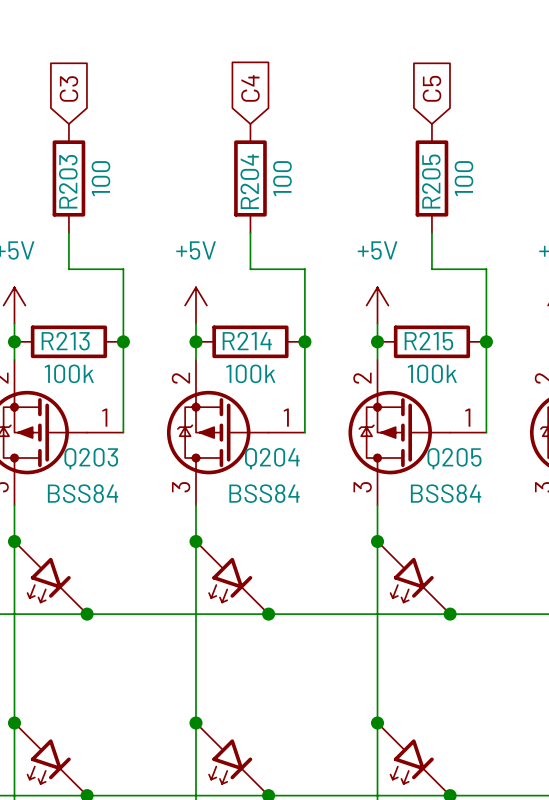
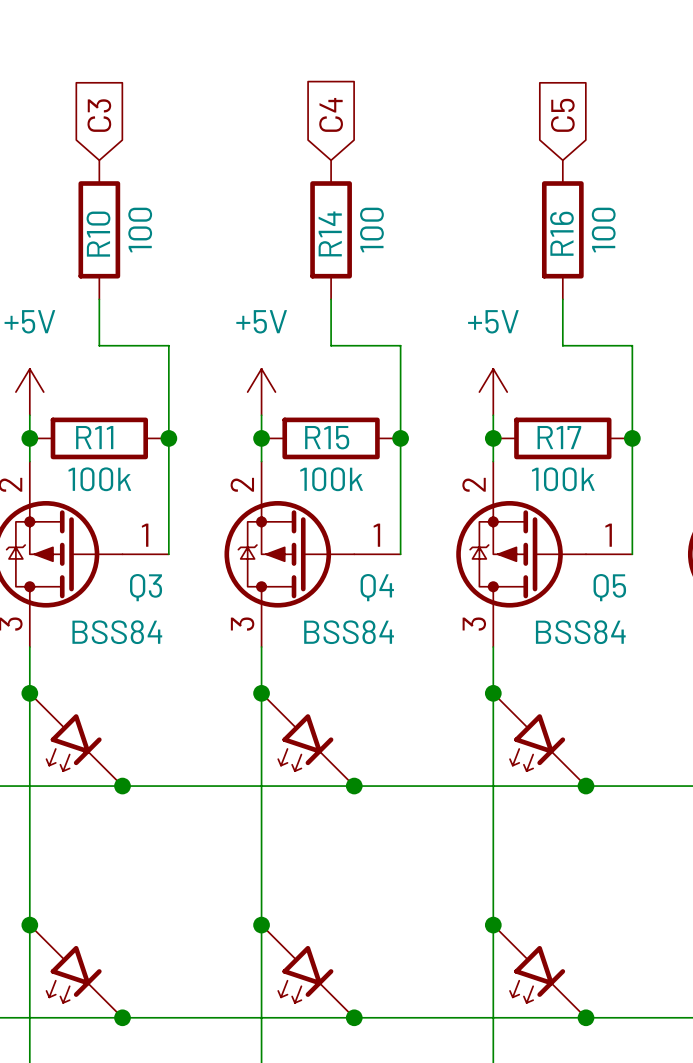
R203 name: R203 (68, 181) -> R10 (98, 234)
R204 name: R204 (249, 181) -> R14 (330, 233)
R205 name: R205 (431, 181) -> R16 (561, 233)
R213 name: R213 (65, 341) -> R11 (94, 437)
R214 name: R214 (247, 341) -> R15 (327, 437)
R215 name: R215 (428, 341) -> R17 (559, 437)
Q203 name: Q203 (91, 458) -> Q3 (146, 587)
Q204 name: Q204 (272, 458) -> Q4 (377, 587)
Q205 name: Q205 (454, 458) -> Q5 (609, 587)

